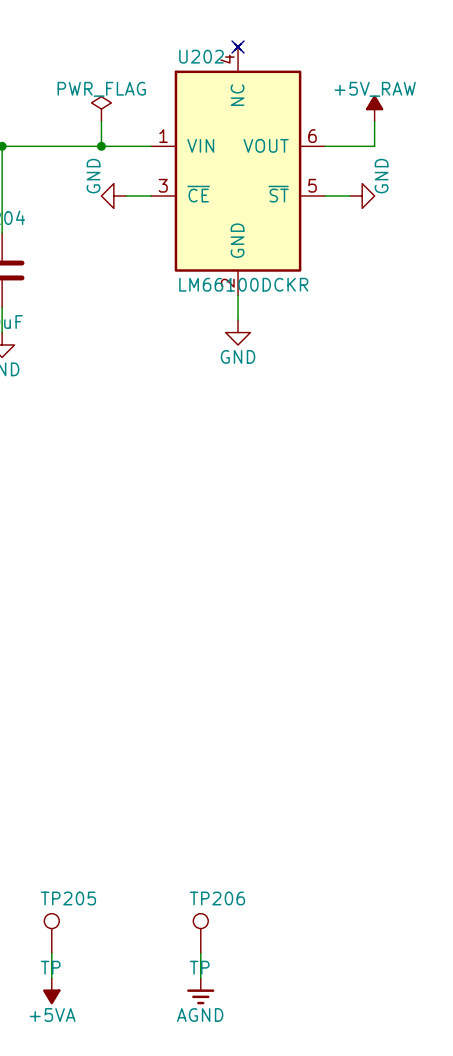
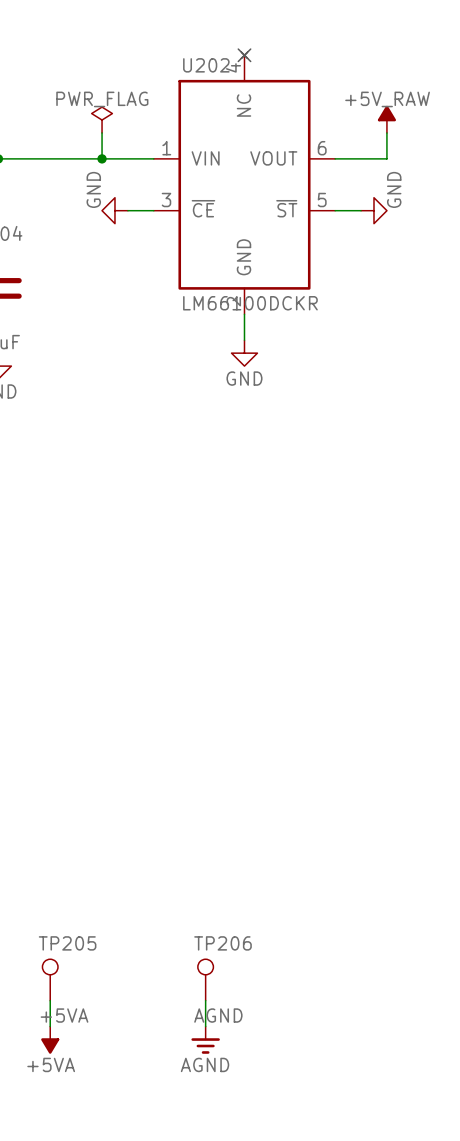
TP205 value: TP (50, 967) -> +5VA (64, 1015)
TP206 value: TP (199, 967) -> AGND (218, 1015)

